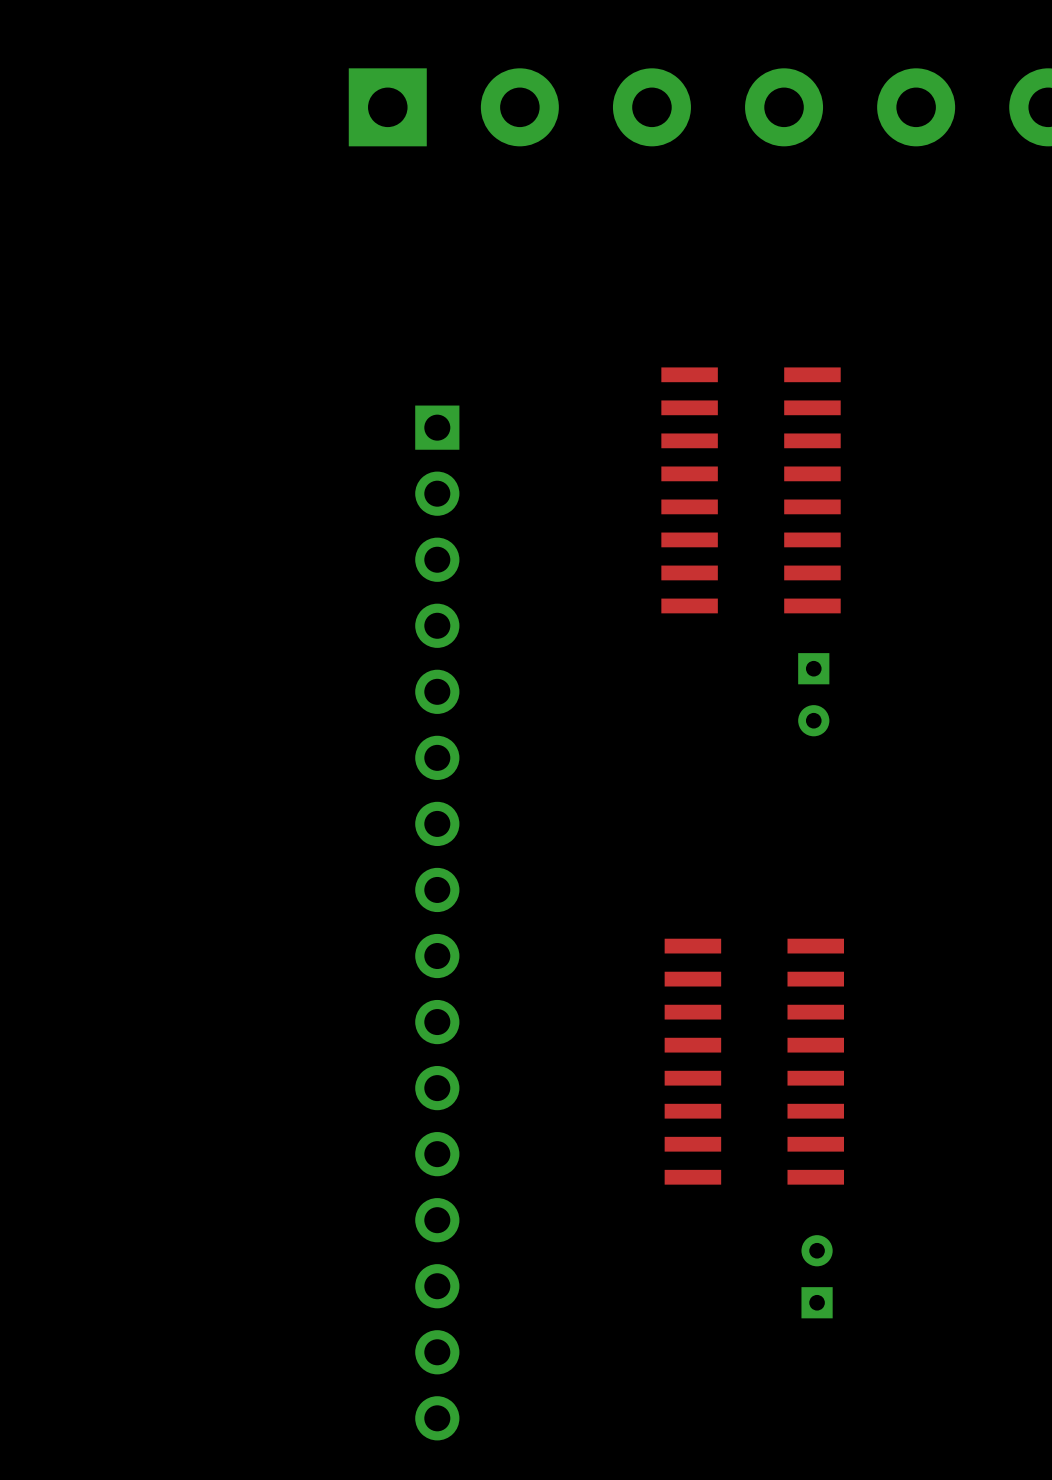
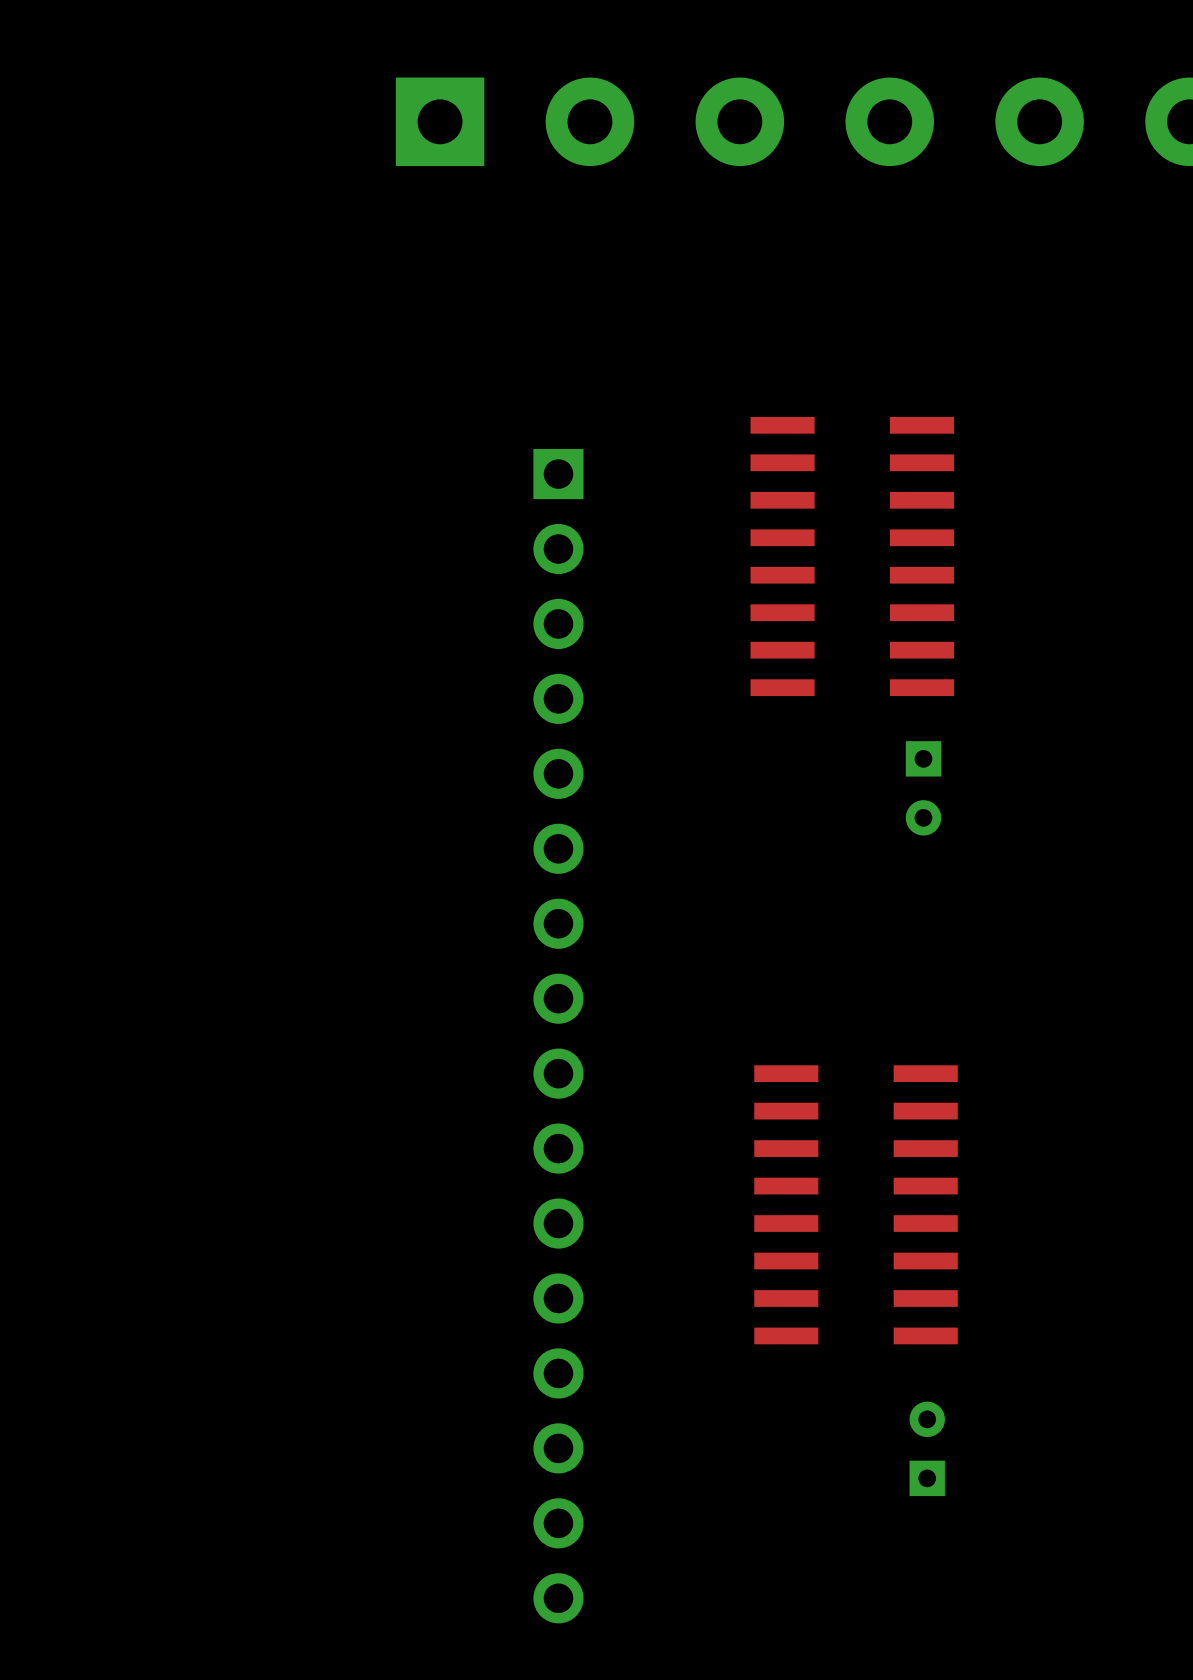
part position: (437, 922) -> (558, 1036)

